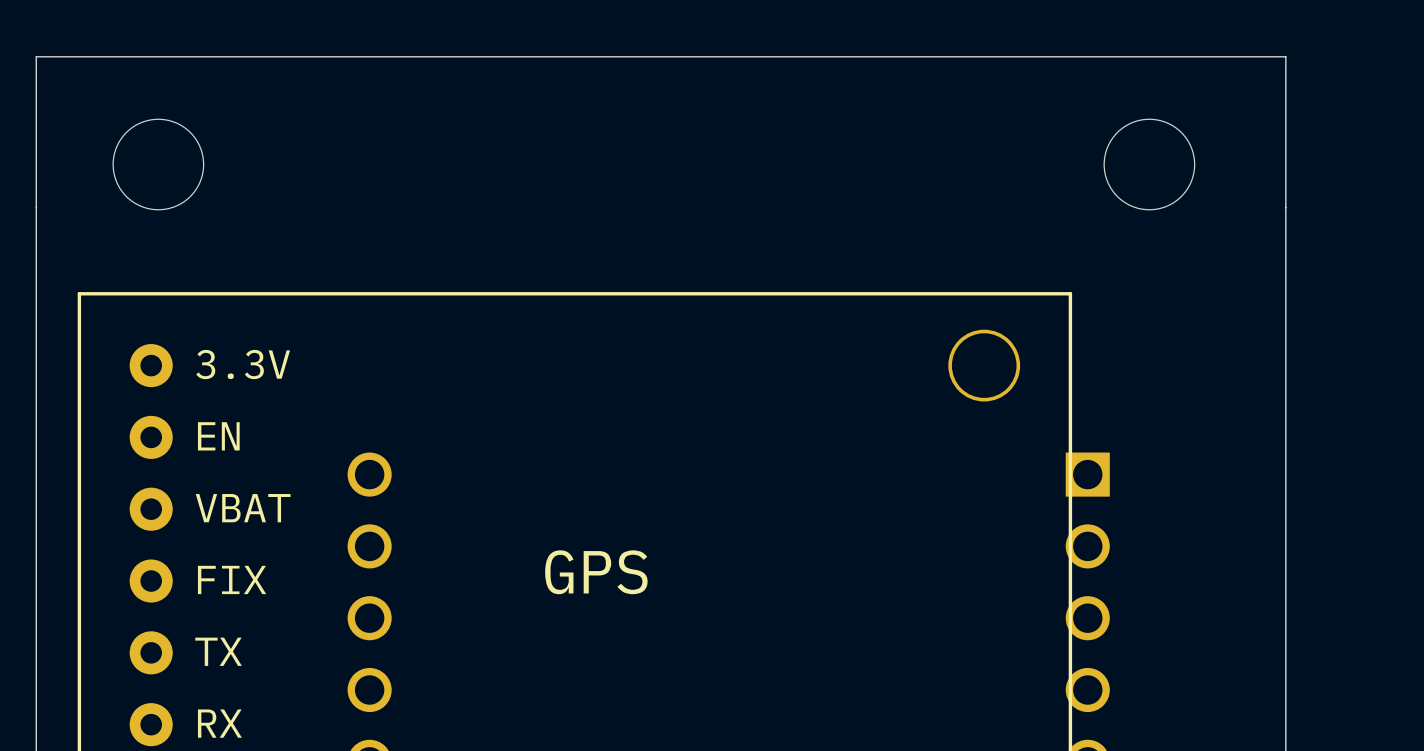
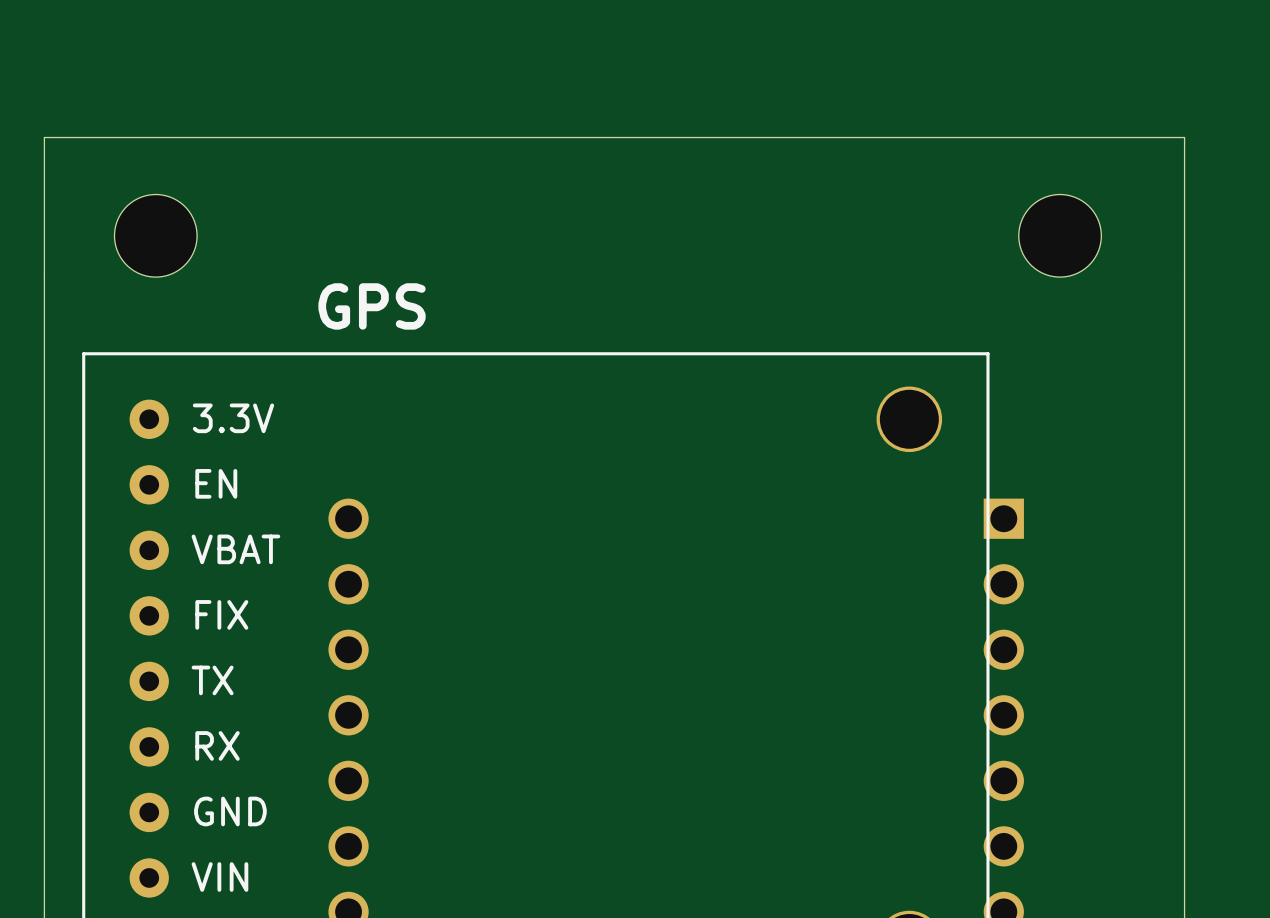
text position: GPS (596, 572) -> GPS (372, 306)

